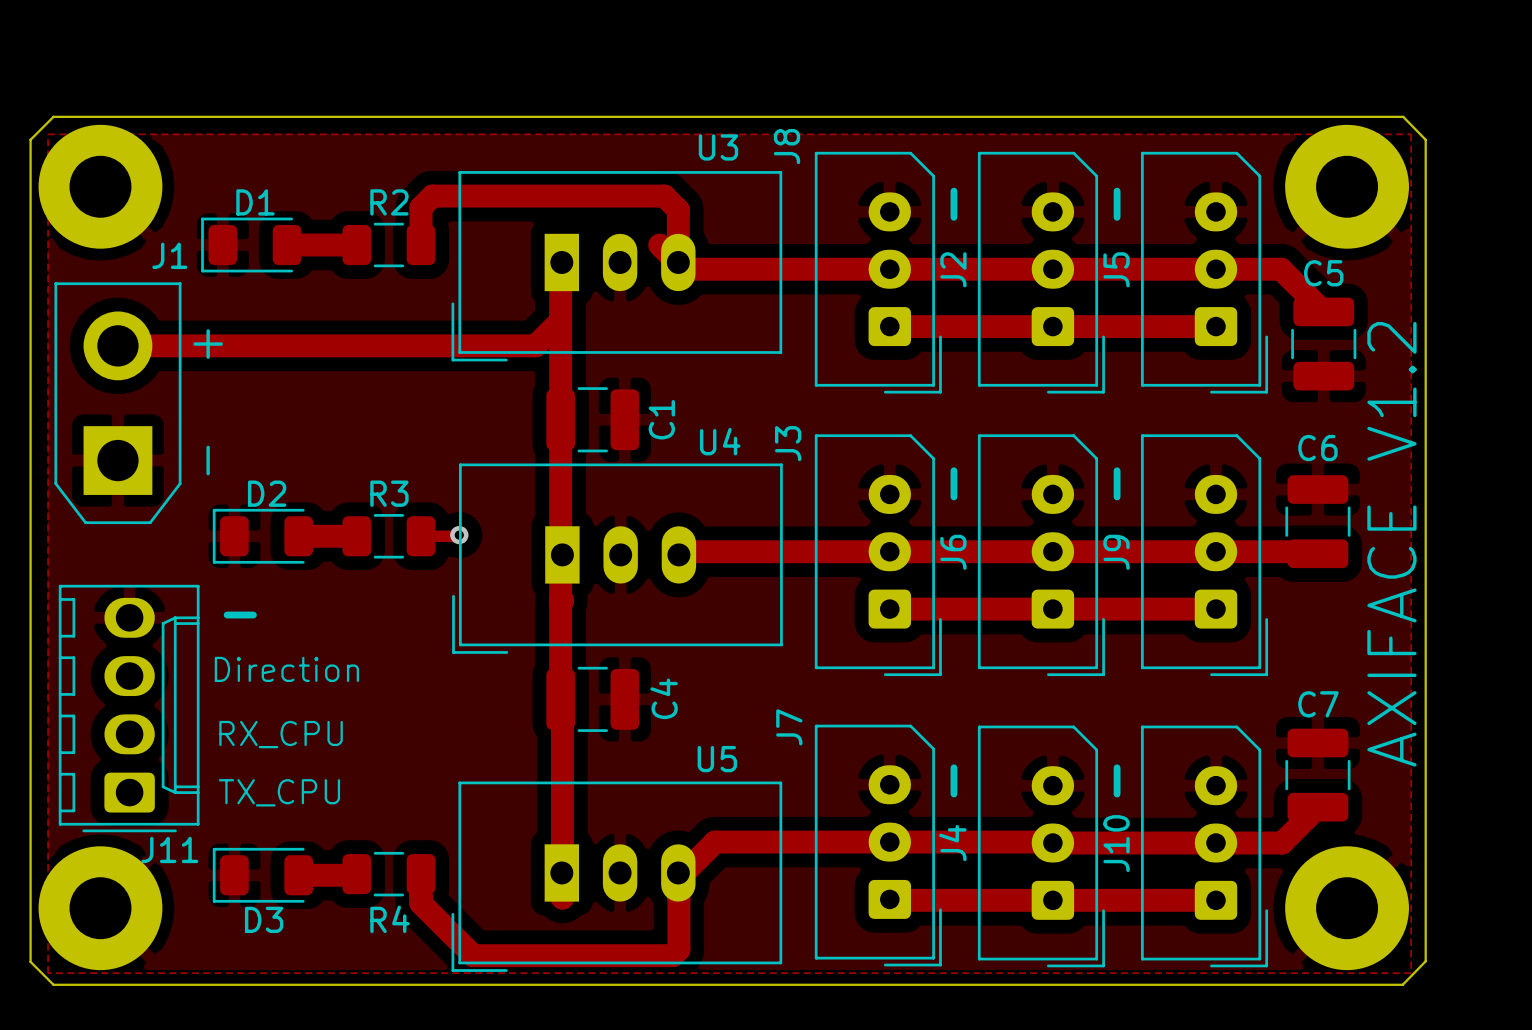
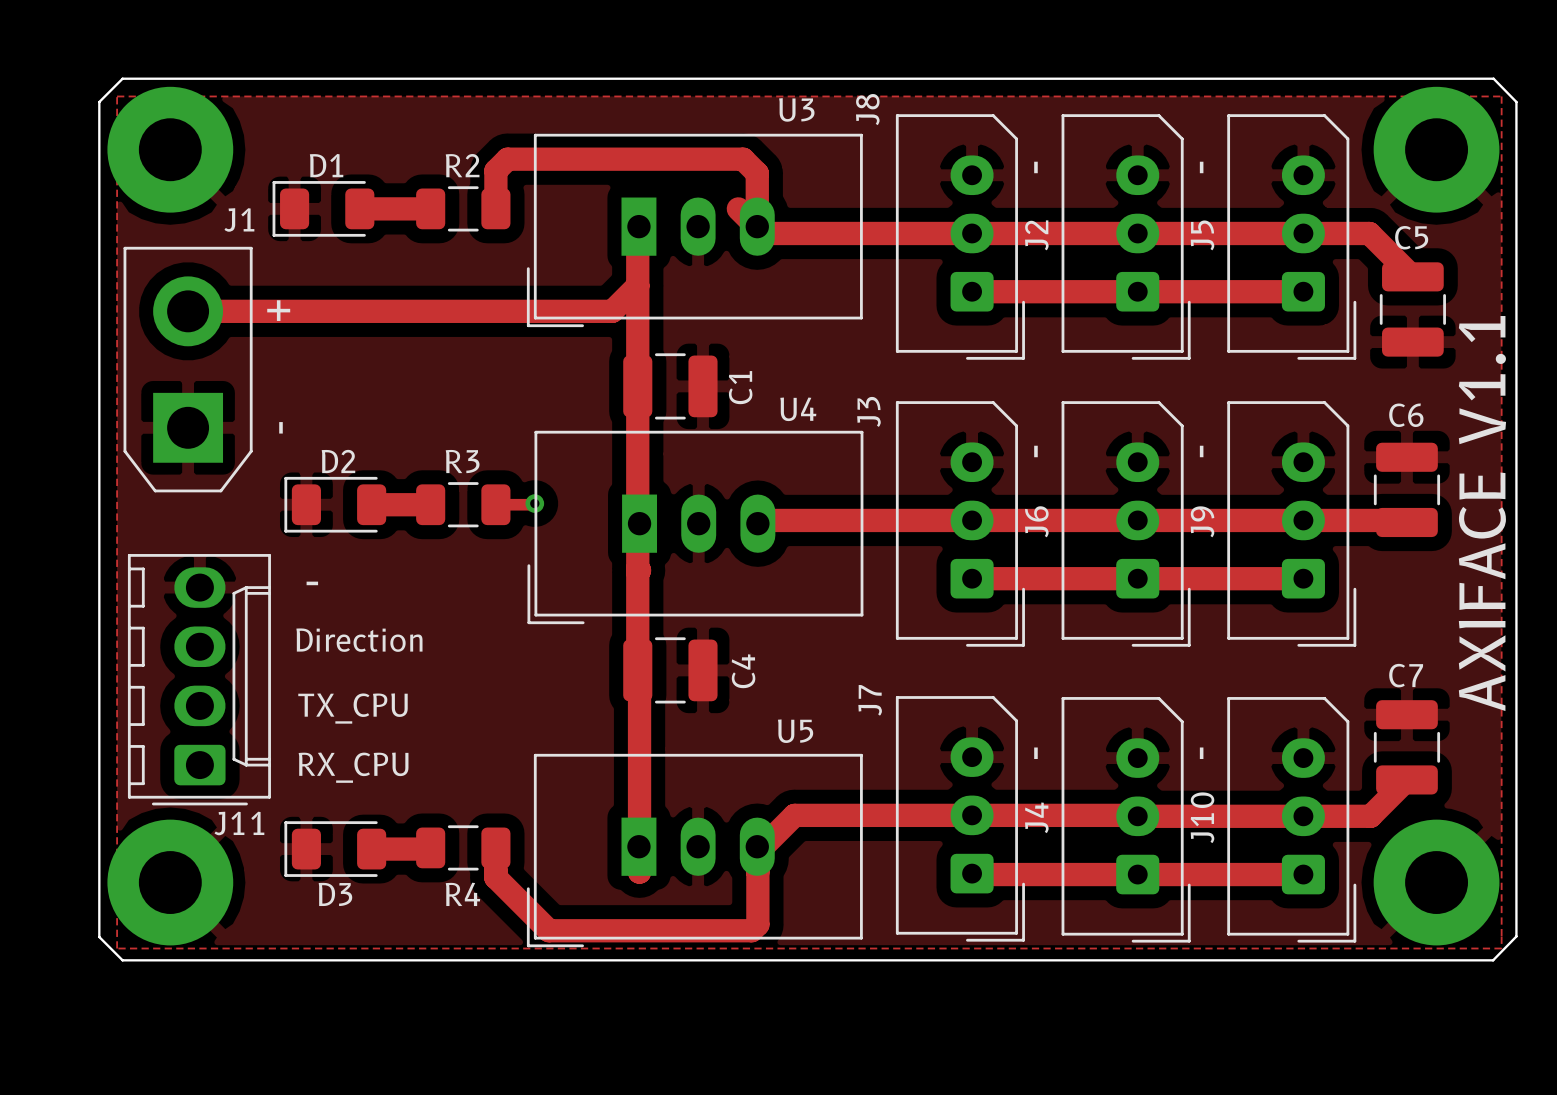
text: AXIFACE V1.2 (1391, 544) -> AXIFACE V1.1 (1482, 513)
text: RX_CPU (281, 734) -> TX_CPU (352, 708)
text: TX_CPU (279, 792) -> RX_CPU (353, 767)

